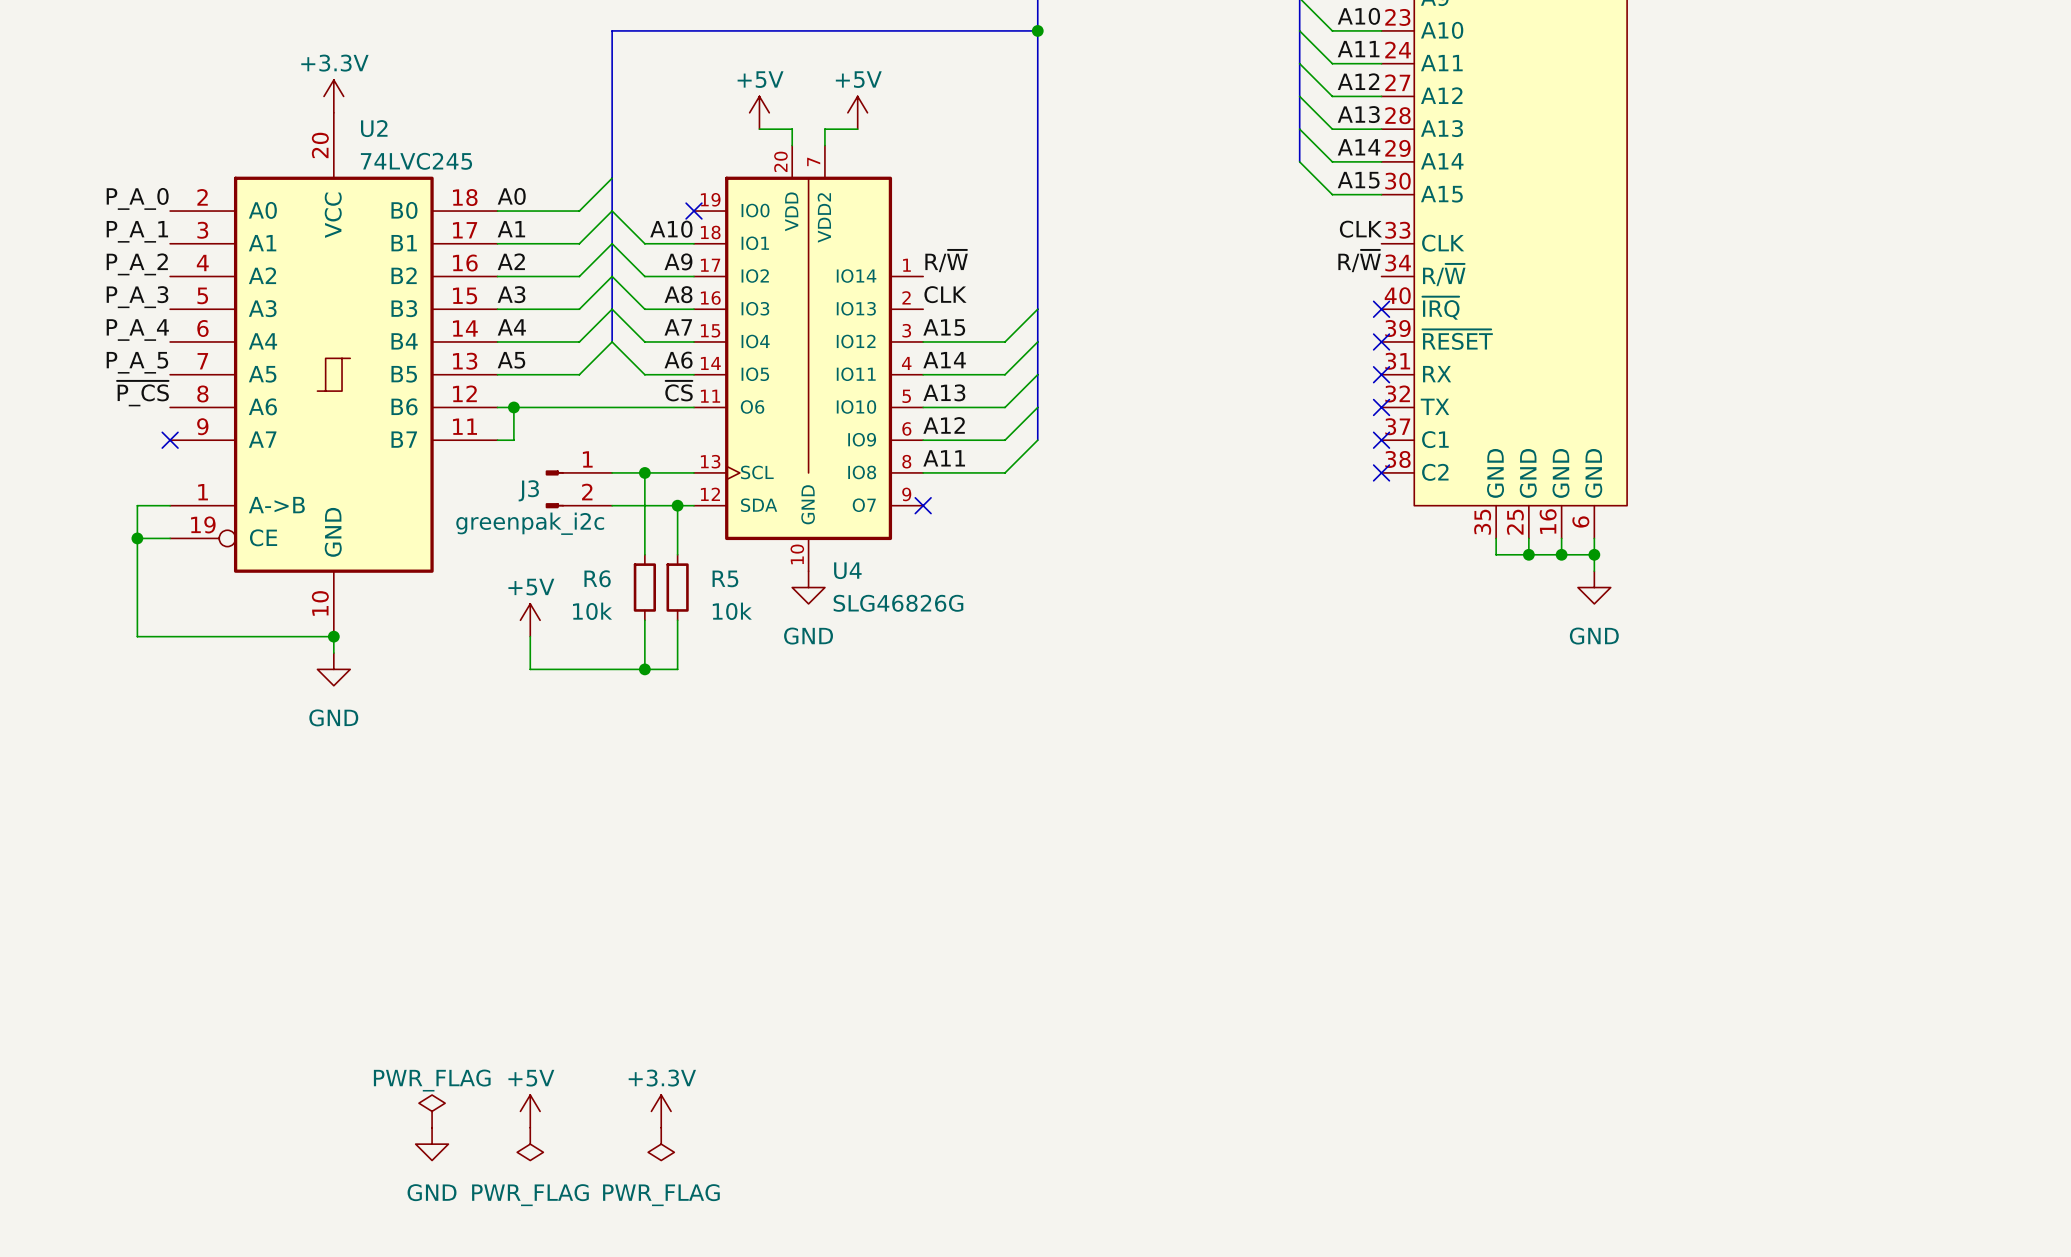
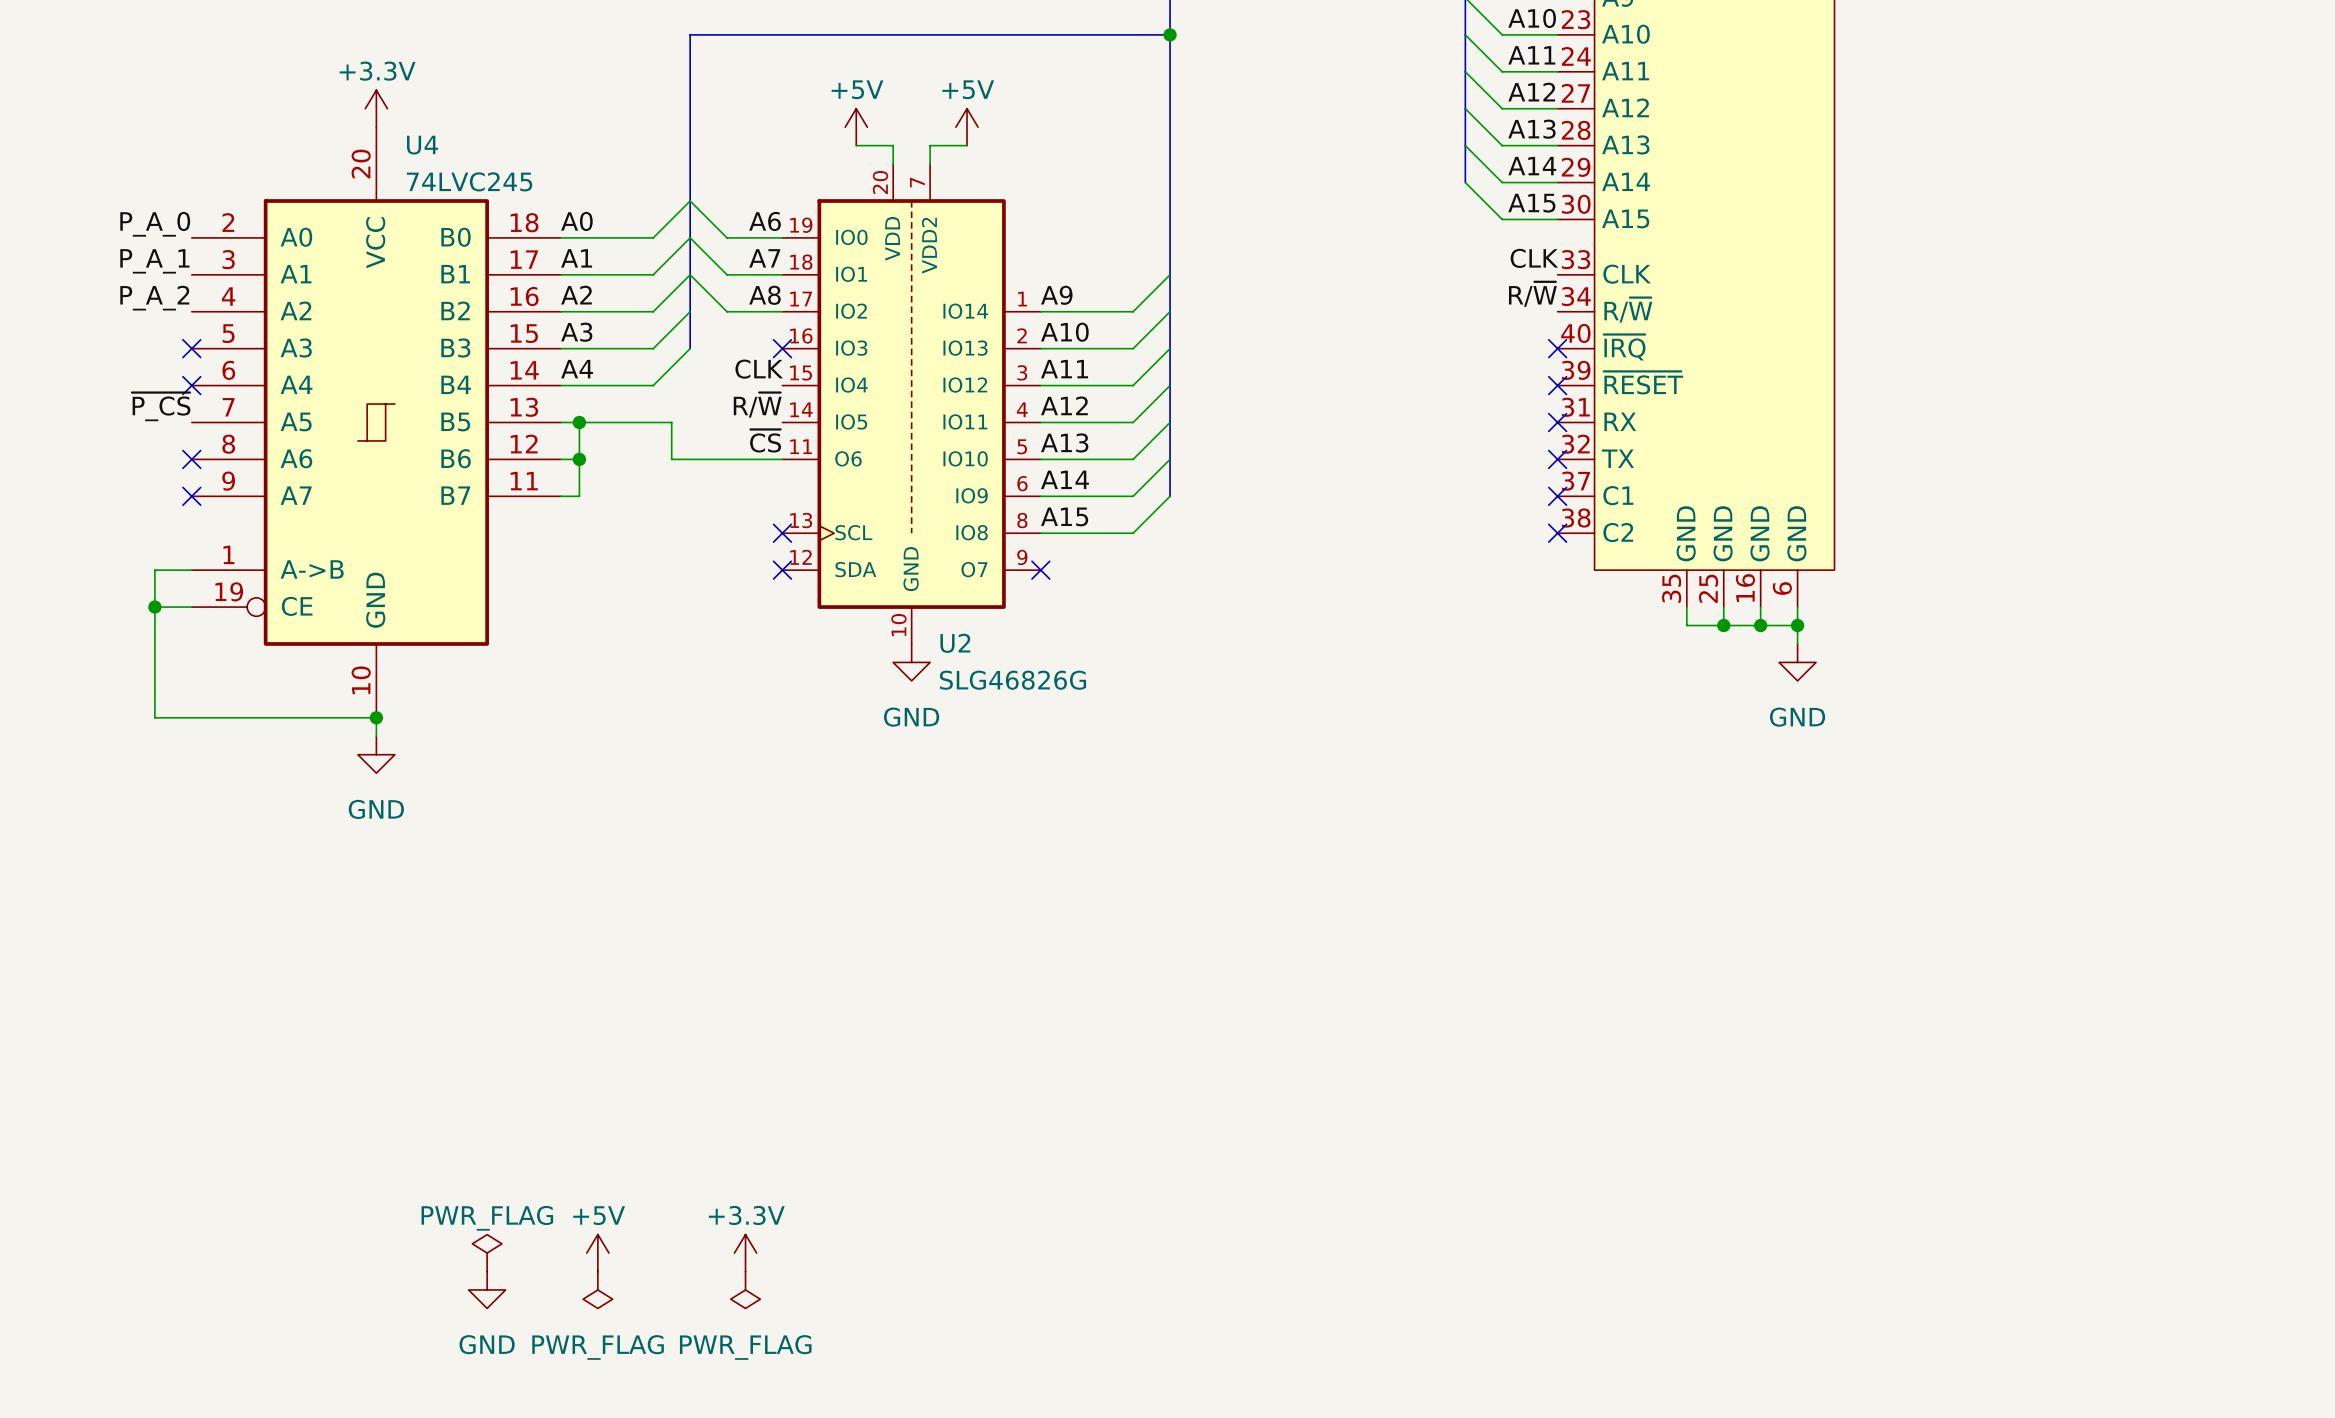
U2 name: U2 (374, 128) -> U4 (422, 145)
label: none -> A6 (765, 221)
no-connect mark: (693, 211) -> none
label: A10 (671, 229) -> A7 (764, 258)
wire: none -> (1170, 274) (1133, 311) (1040, 311)
label: A9 (678, 261) -> A8 (764, 295)
label: R/~{W} (946, 261) -> A9 (1056, 295)
wire: (612, 276) (644, 309) (693, 309) -> (690, 201) (727, 237) (782, 237)
wire: none -> (1170, 311) (1133, 348) (1040, 348)
label: A8 (678, 294) -> none
label: CLK (945, 294) -> A10 (1064, 332)
label: P_A_3 (137, 297) -> none
no-connect mark: none -> (191, 348)
wire: (612, 309) (644, 341) (693, 341) -> none
bus: (612, 309) (612, 341) -> none
no-connect mark: none -> (782, 348)
label: A7 (678, 327) -> CLK (759, 369)
label: A15 (944, 327) -> A11 (1064, 369)
label: P_A_4 (137, 330) -> none
no-connect mark: none -> (191, 385)
U4: SLG46826G (808, 358) -> none
U2: none -> SLG46826G (911, 404)
label: A5 (511, 360) -> none
label: A6 (678, 360) -> R/~{W} (757, 405)
label: A14 (944, 360) -> A12 (1064, 405)
label: P_A_5 (137, 362) -> ~{P_CS} (161, 406)
wire: none -> (579, 422) (579, 459)
junction: none -> (579, 422)
wire: (579, 374) (612, 341) (644, 374) (693, 374) -> none
label: ~{P_CS} (142, 393) -> none
no-connect mark: none -> (191, 459)
wire: (513, 407) (595, 407) -> (653, 422) (671, 422) (671, 459)
label: A12 (944, 425) -> A14 (1064, 479)
label: A11 (944, 458) -> A15 (1064, 516)
wire: (612, 472) (693, 472) -> none
wire: (644, 472) (644, 554) -> none
junction: (644, 472) -> none
no-connect mark: none -> (782, 533)
J3: greenpak_i2c (578, 489) -> none
wire: (612, 505) (693, 505) -> none
wire: (677, 505) (677, 554) -> none
junction: (677, 505) -> none
no-connect mark: none -> (782, 570)
R6: 10k (644, 587) -> none
R5: 10k (677, 587) -> none
power symbol: +5V (530, 620) -> none
wire: (644, 620) (644, 669) -> none
wire: (677, 620) (677, 669) (530, 669) (530, 636) -> none
junction: (644, 669) -> none

